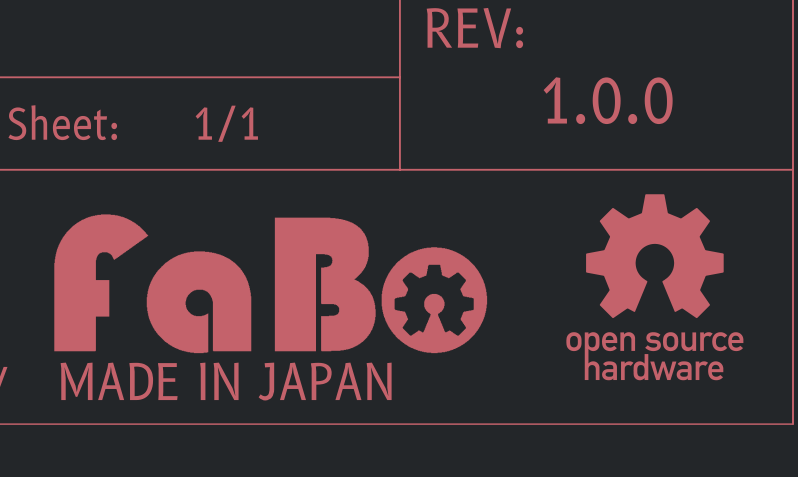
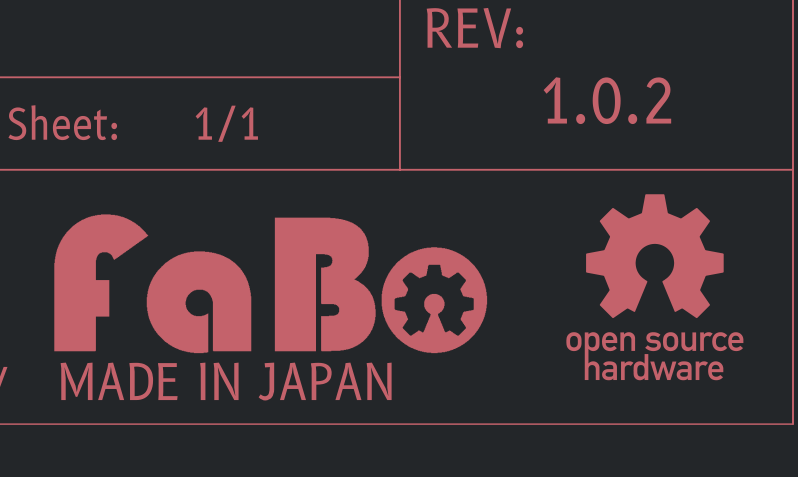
text: 1.0.0 (608, 100) -> 1.0.2 (607, 100)

